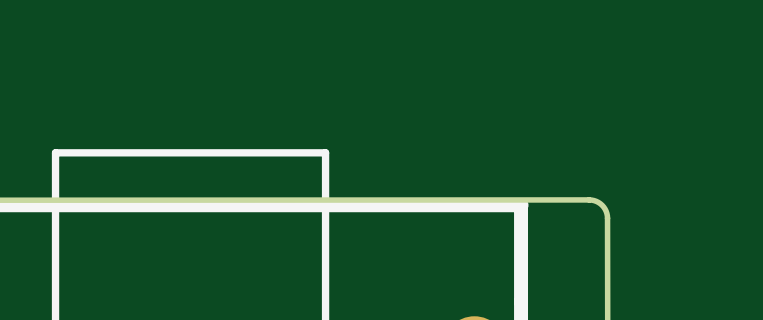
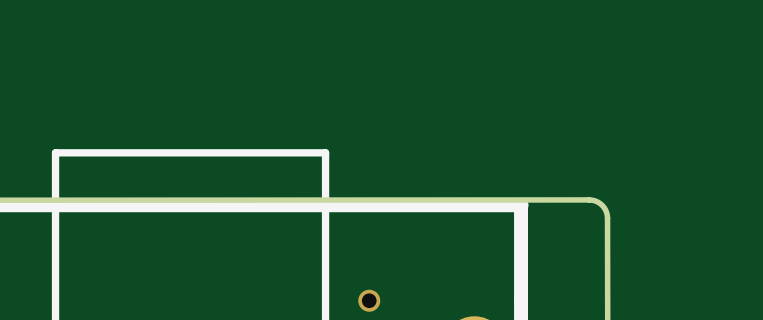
via: none -> (369, 300)

